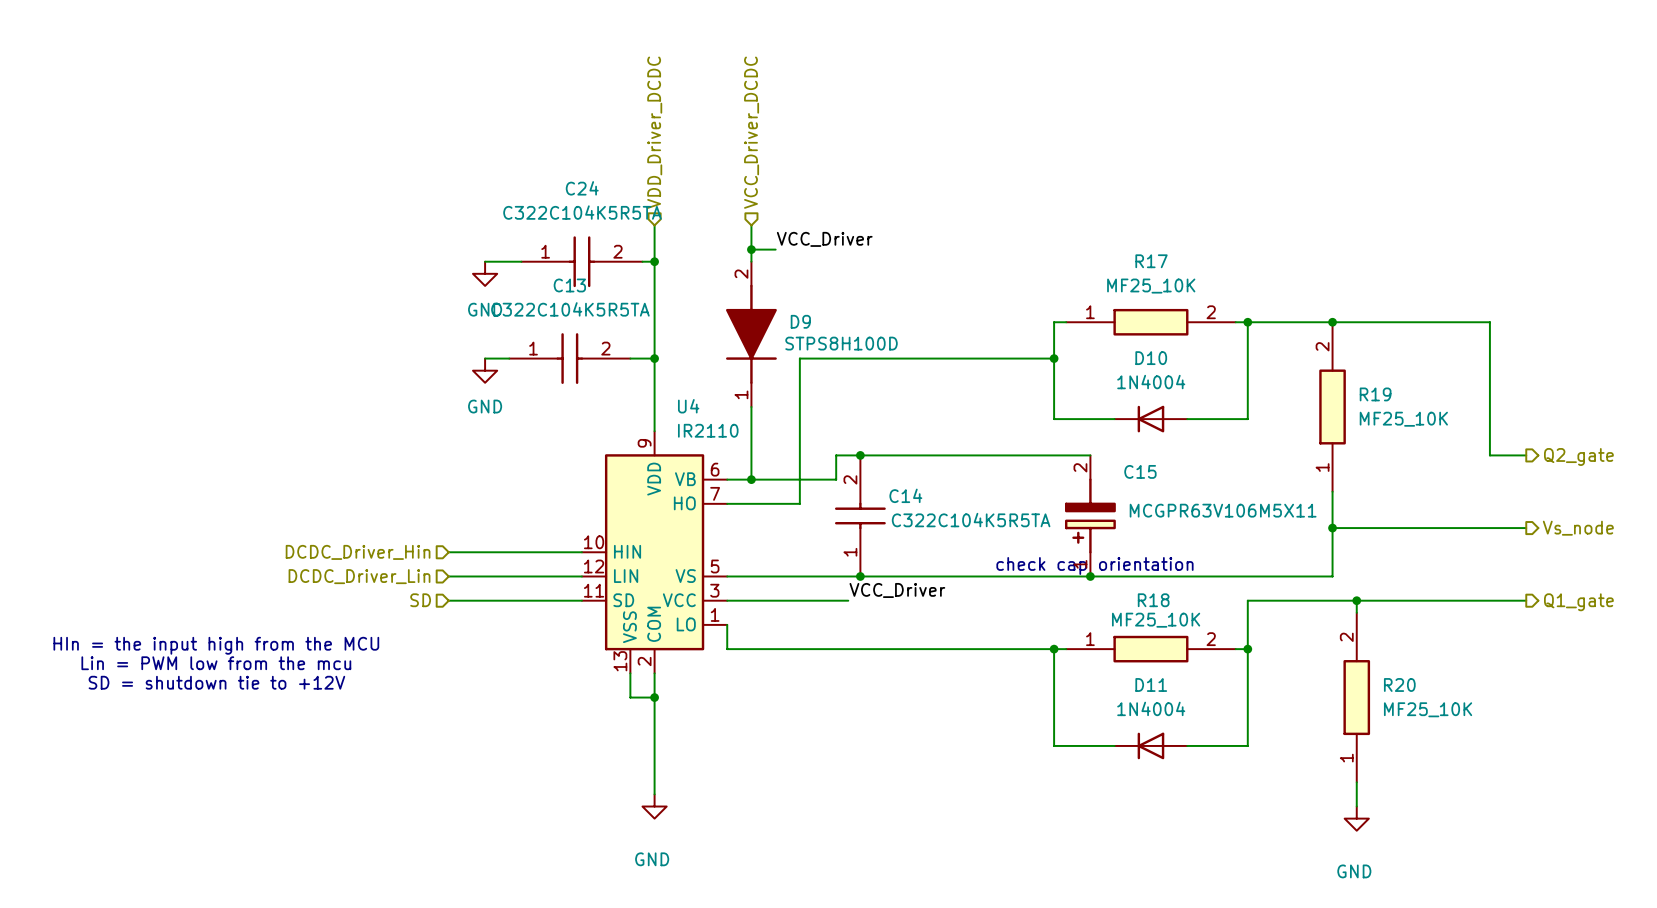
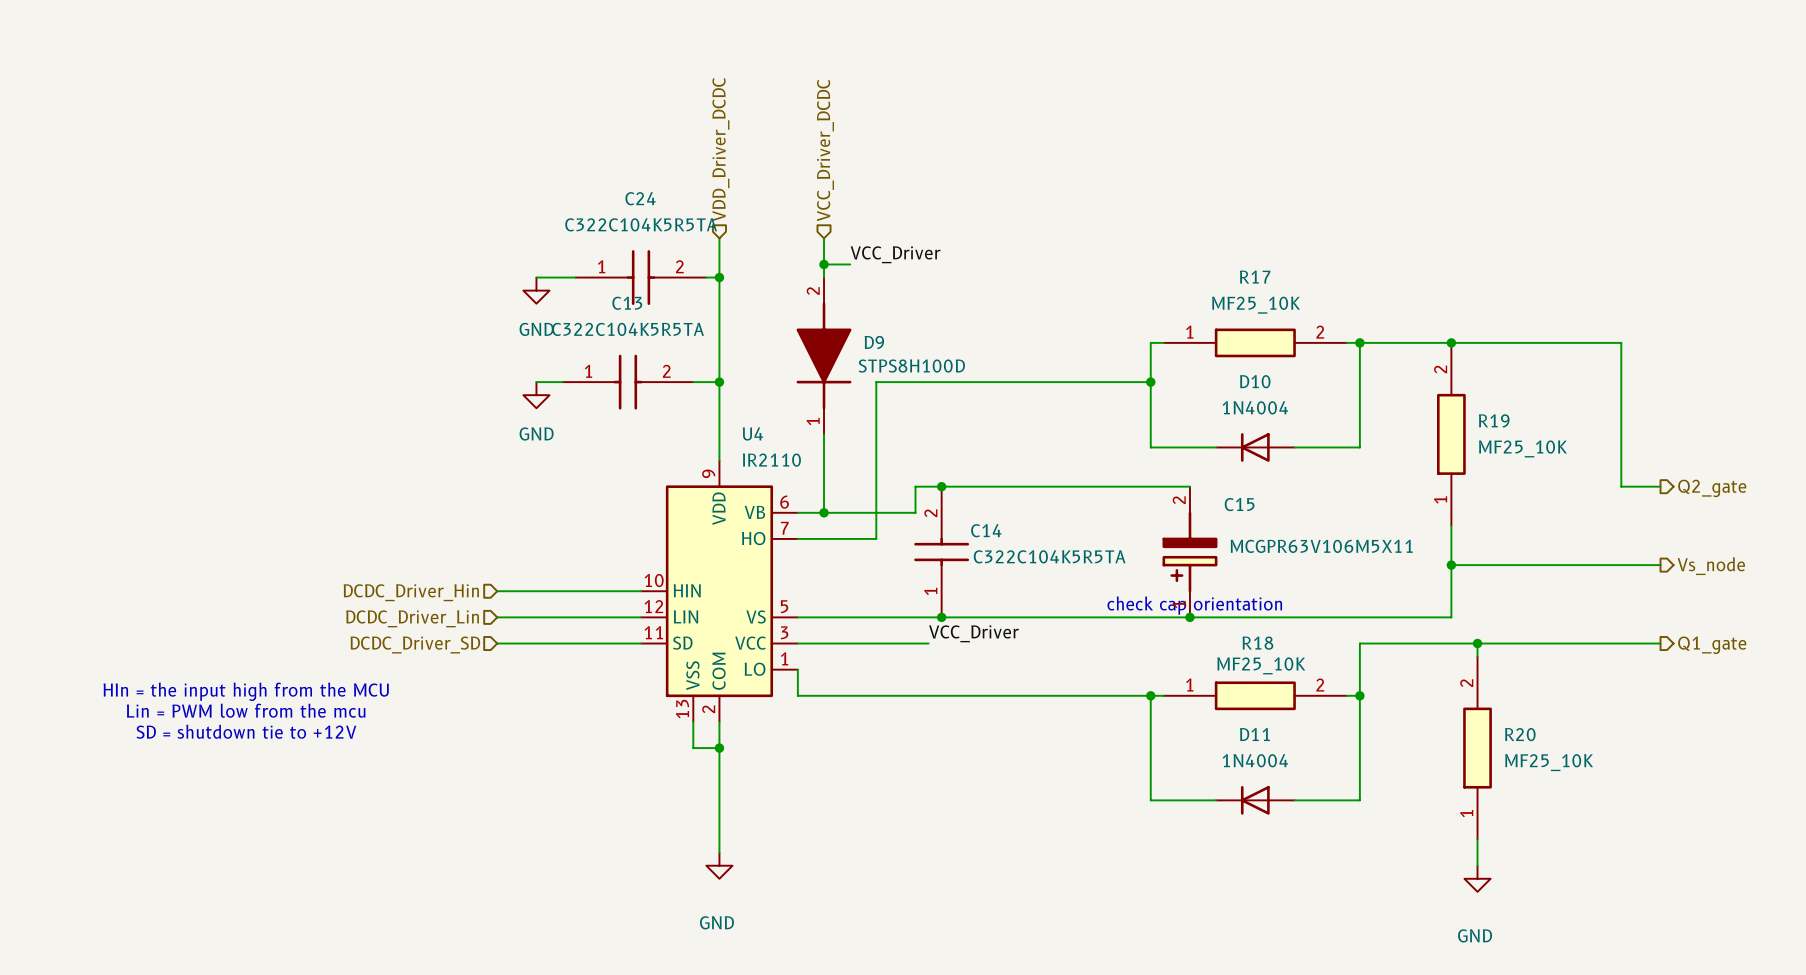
hierarchical label: SD (420, 600) -> DCDC_Driver_SD (415, 645)

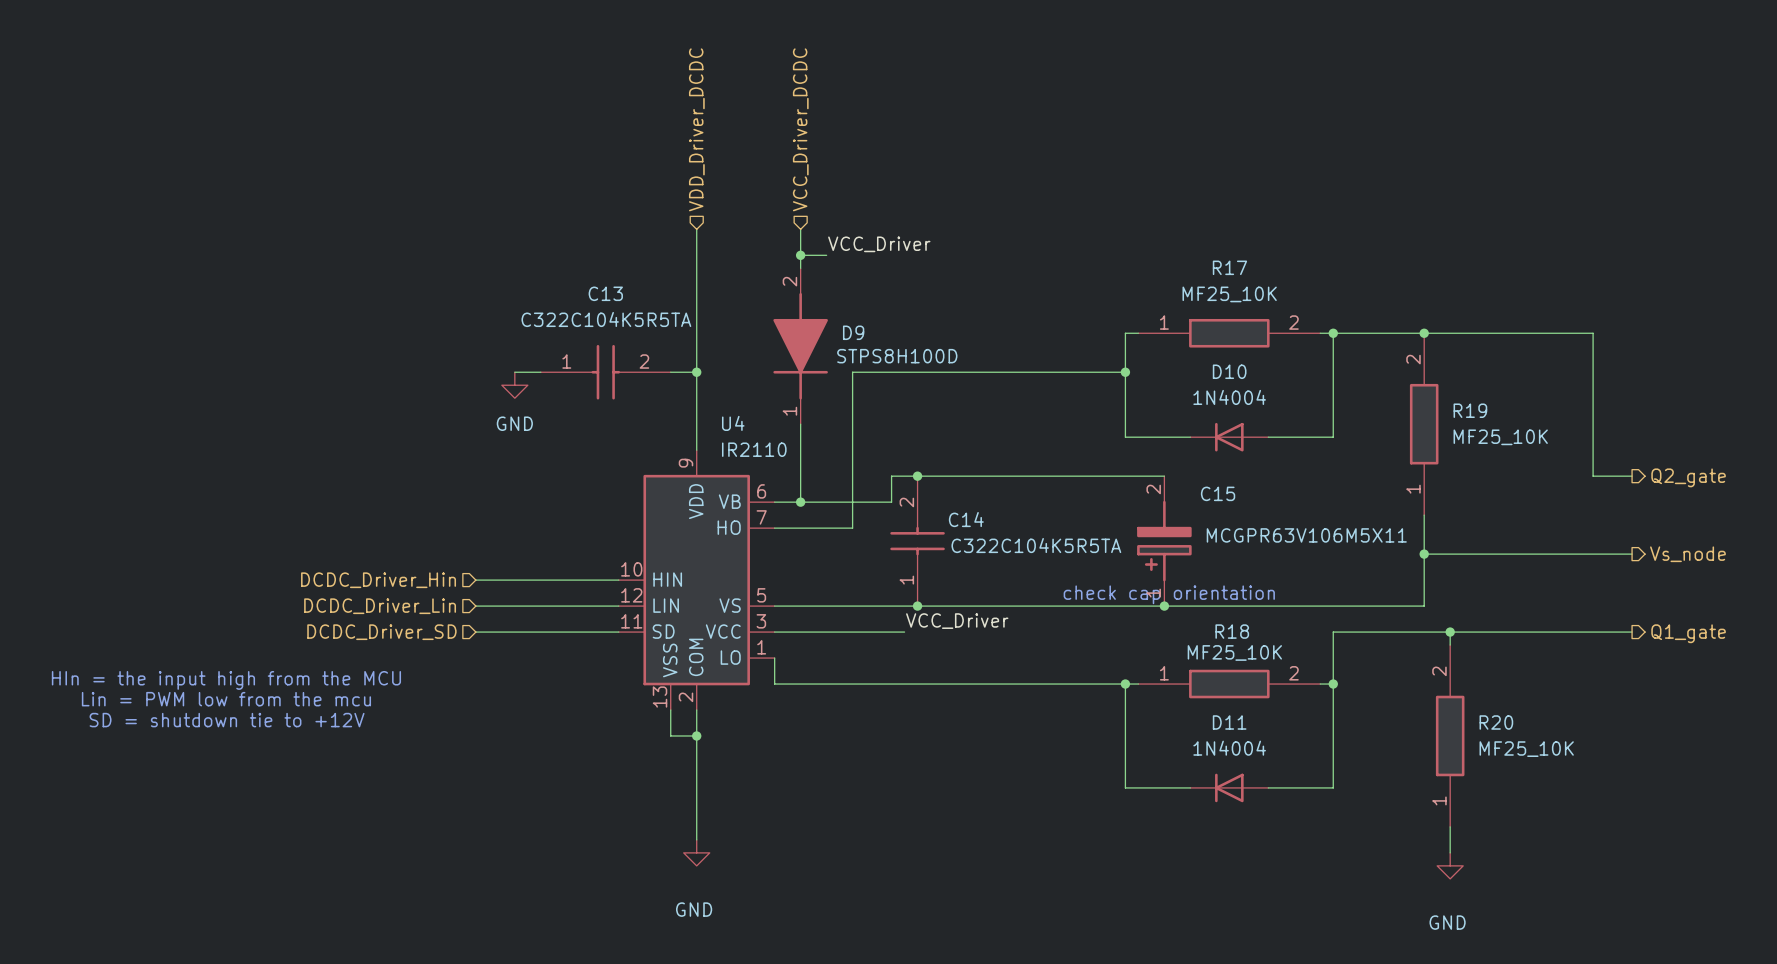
wire: (536, 277) (575, 277) -> none
C24: C322C104K5R5TA (641, 277) -> none
wire: (706, 277) (719, 277) -> none
junction: (719, 277) -> none
power symbol: GND (536, 290) -> none

